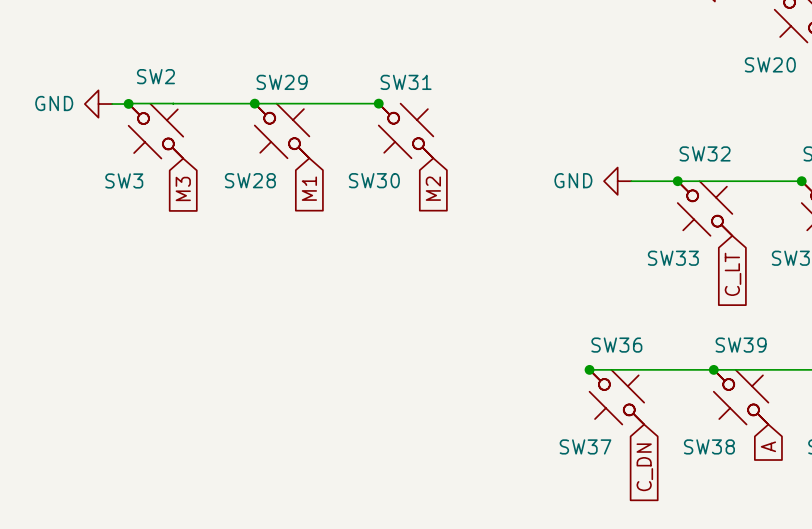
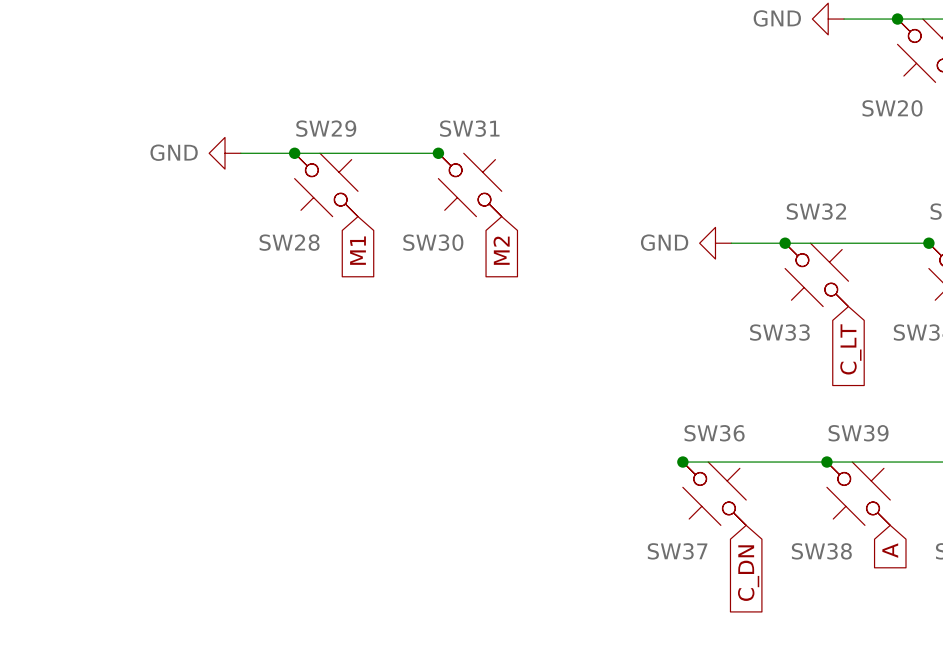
junction: (128, 103) -> none
wire: (173, 103) (112, 104) -> none
wire: (173, 103) (208, 103) -> none
power symbol position: GND (98, 104) -> GND (225, 153)
SW2: (155, 131) -> none
SW3: (155, 131) -> none
global label: M3 (183, 188) -> none

